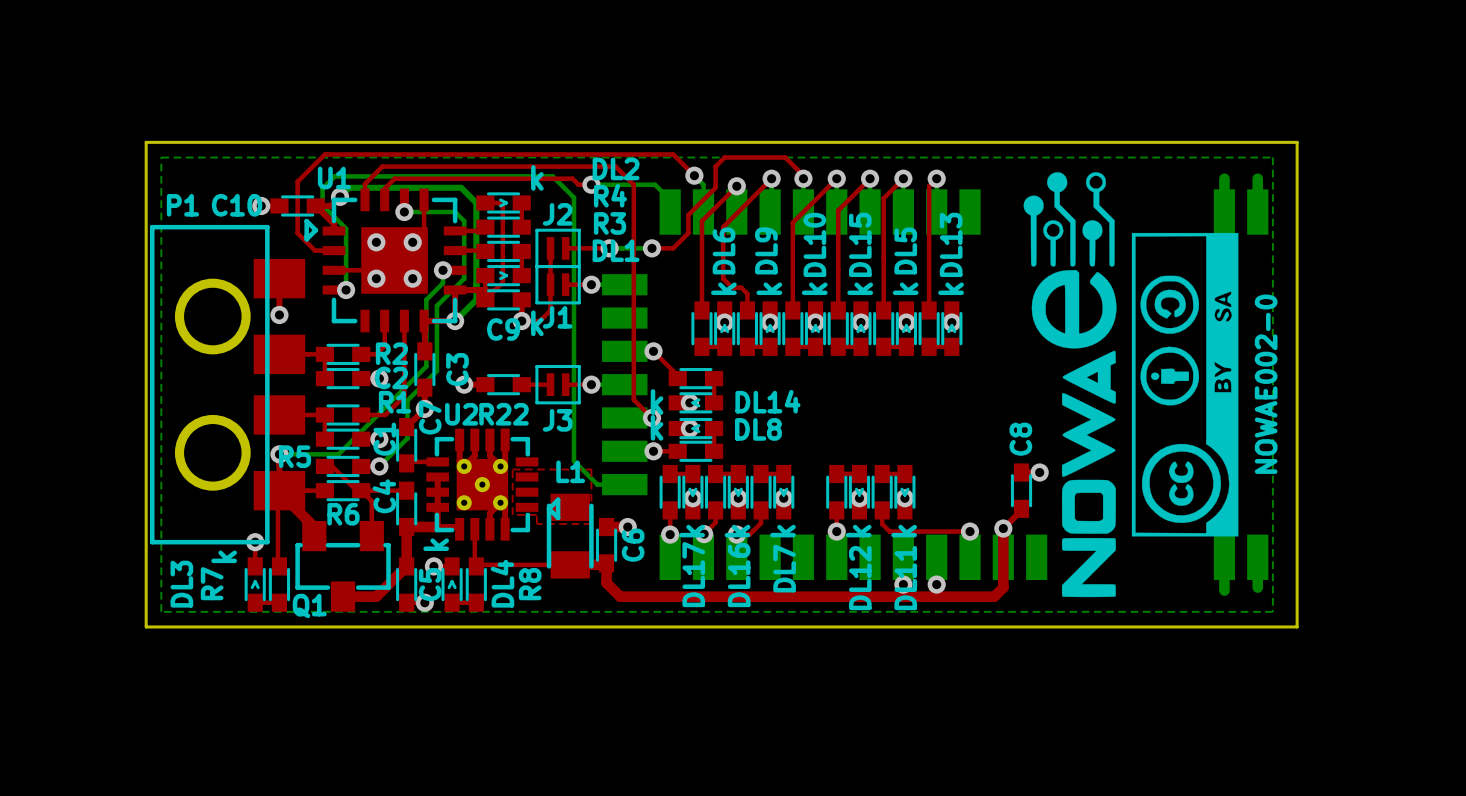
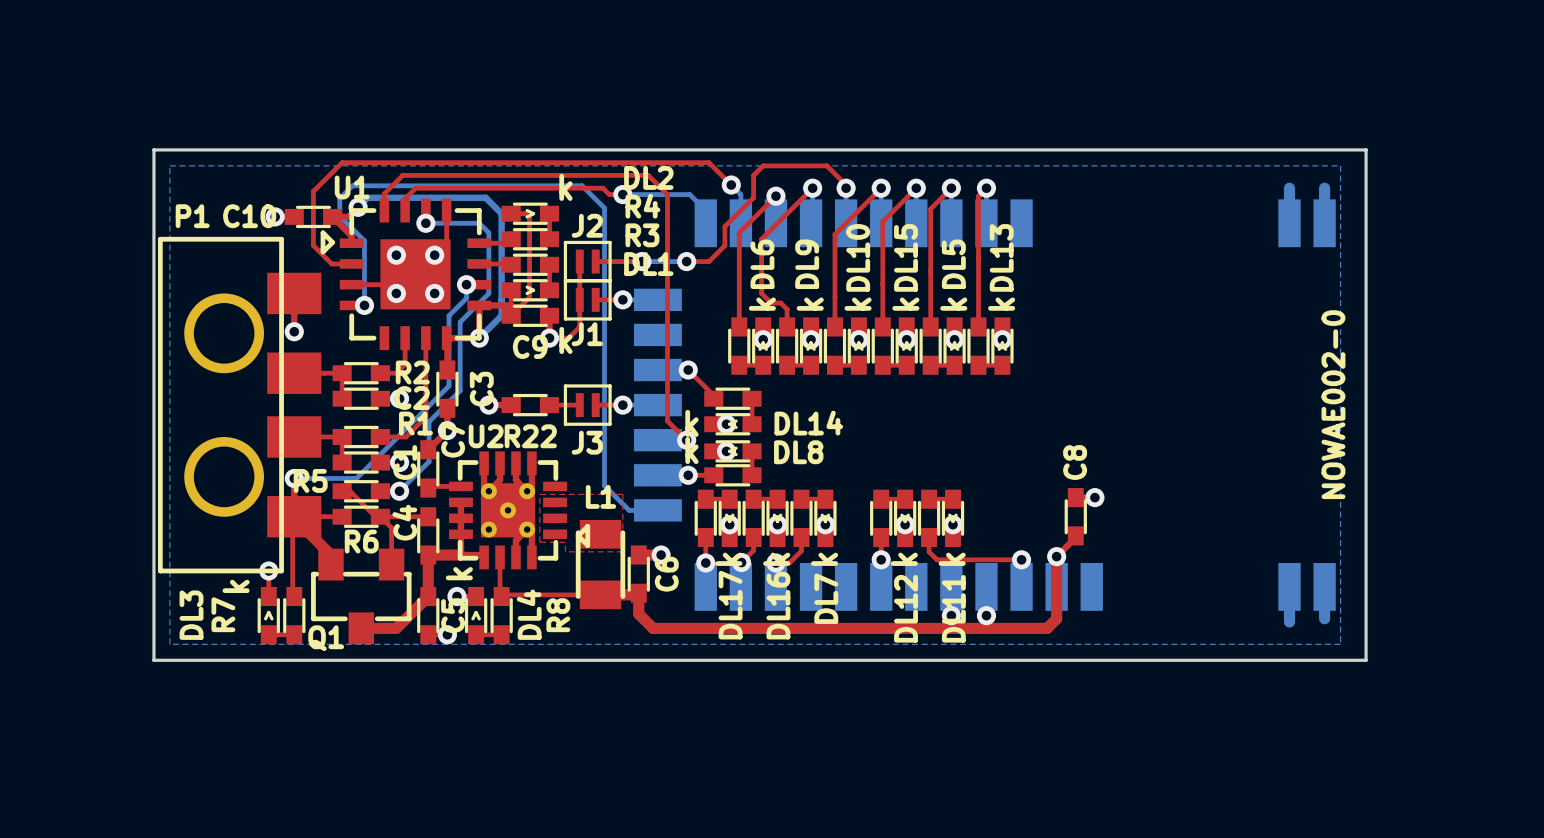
drawing: [1023, 172, 1239, 598] -> none

